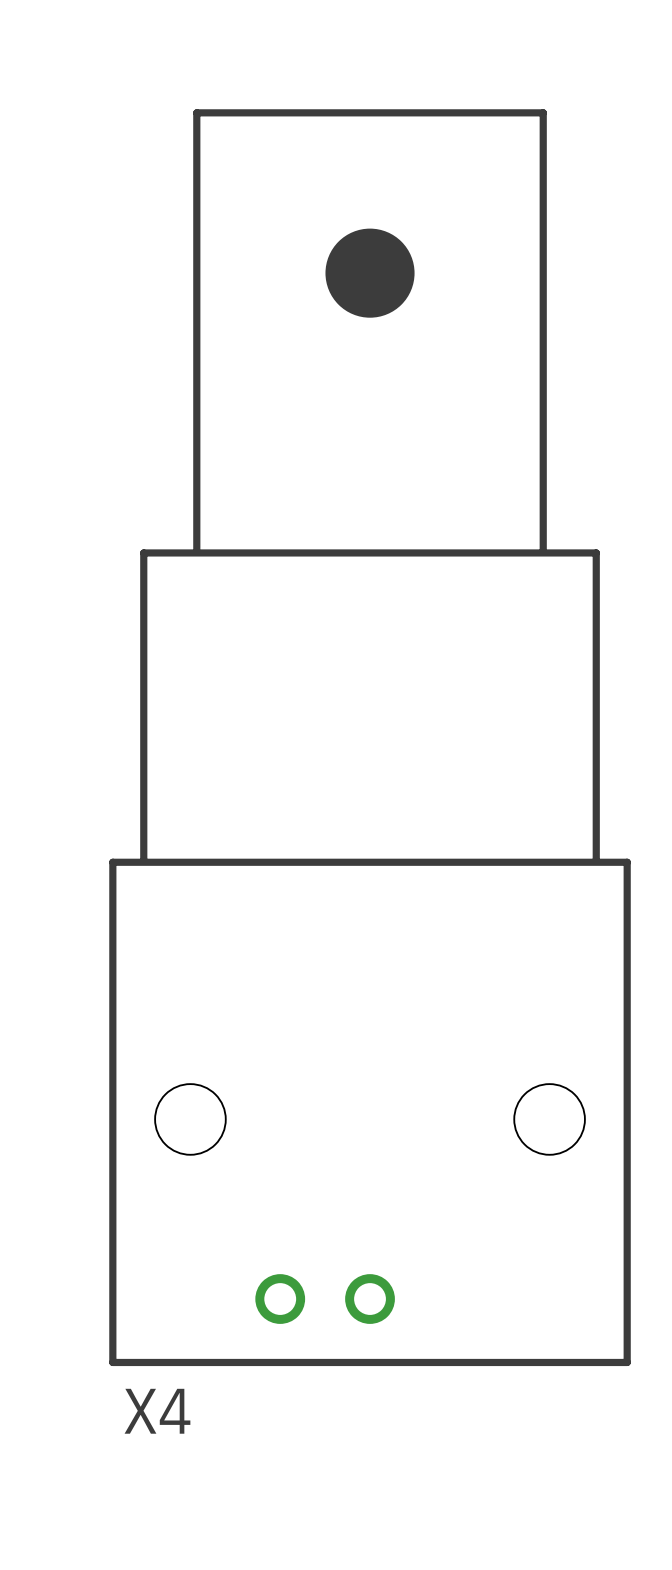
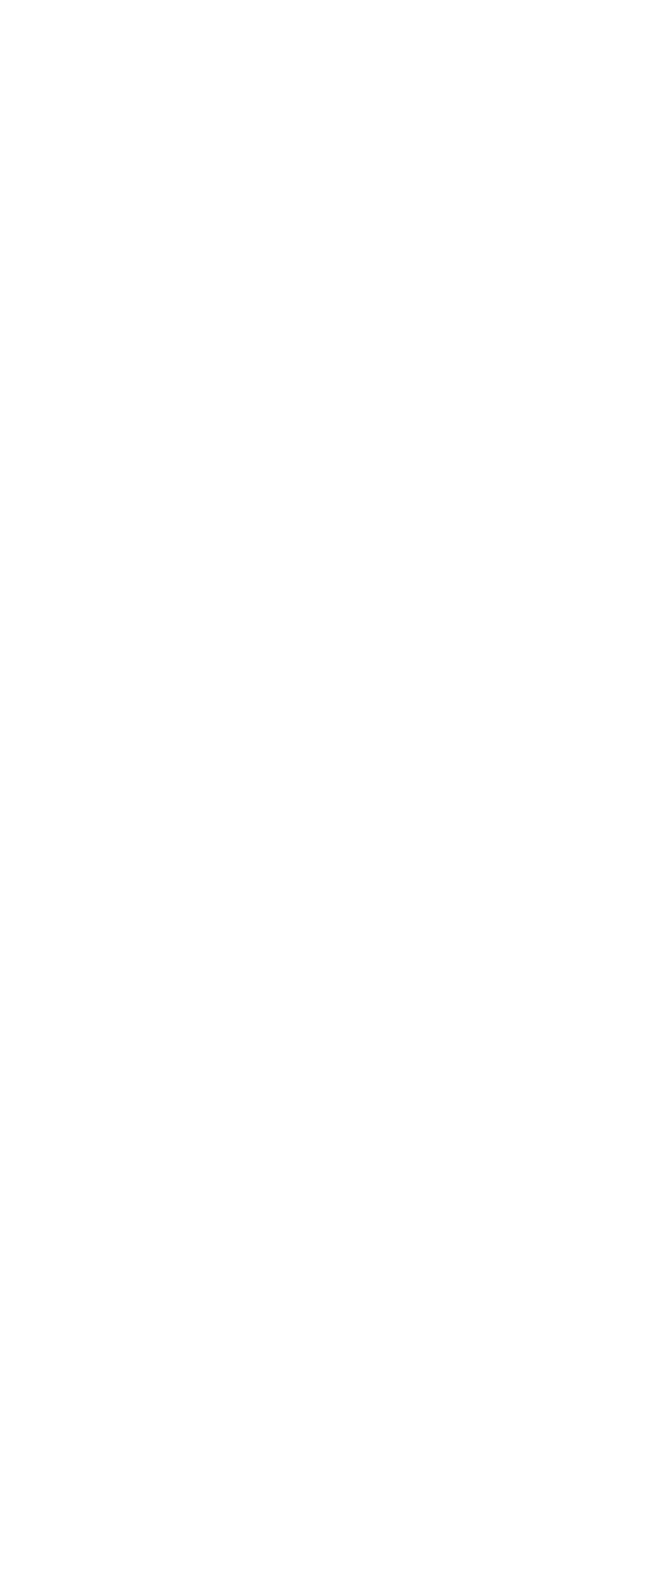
X4: (370, 737) -> none

